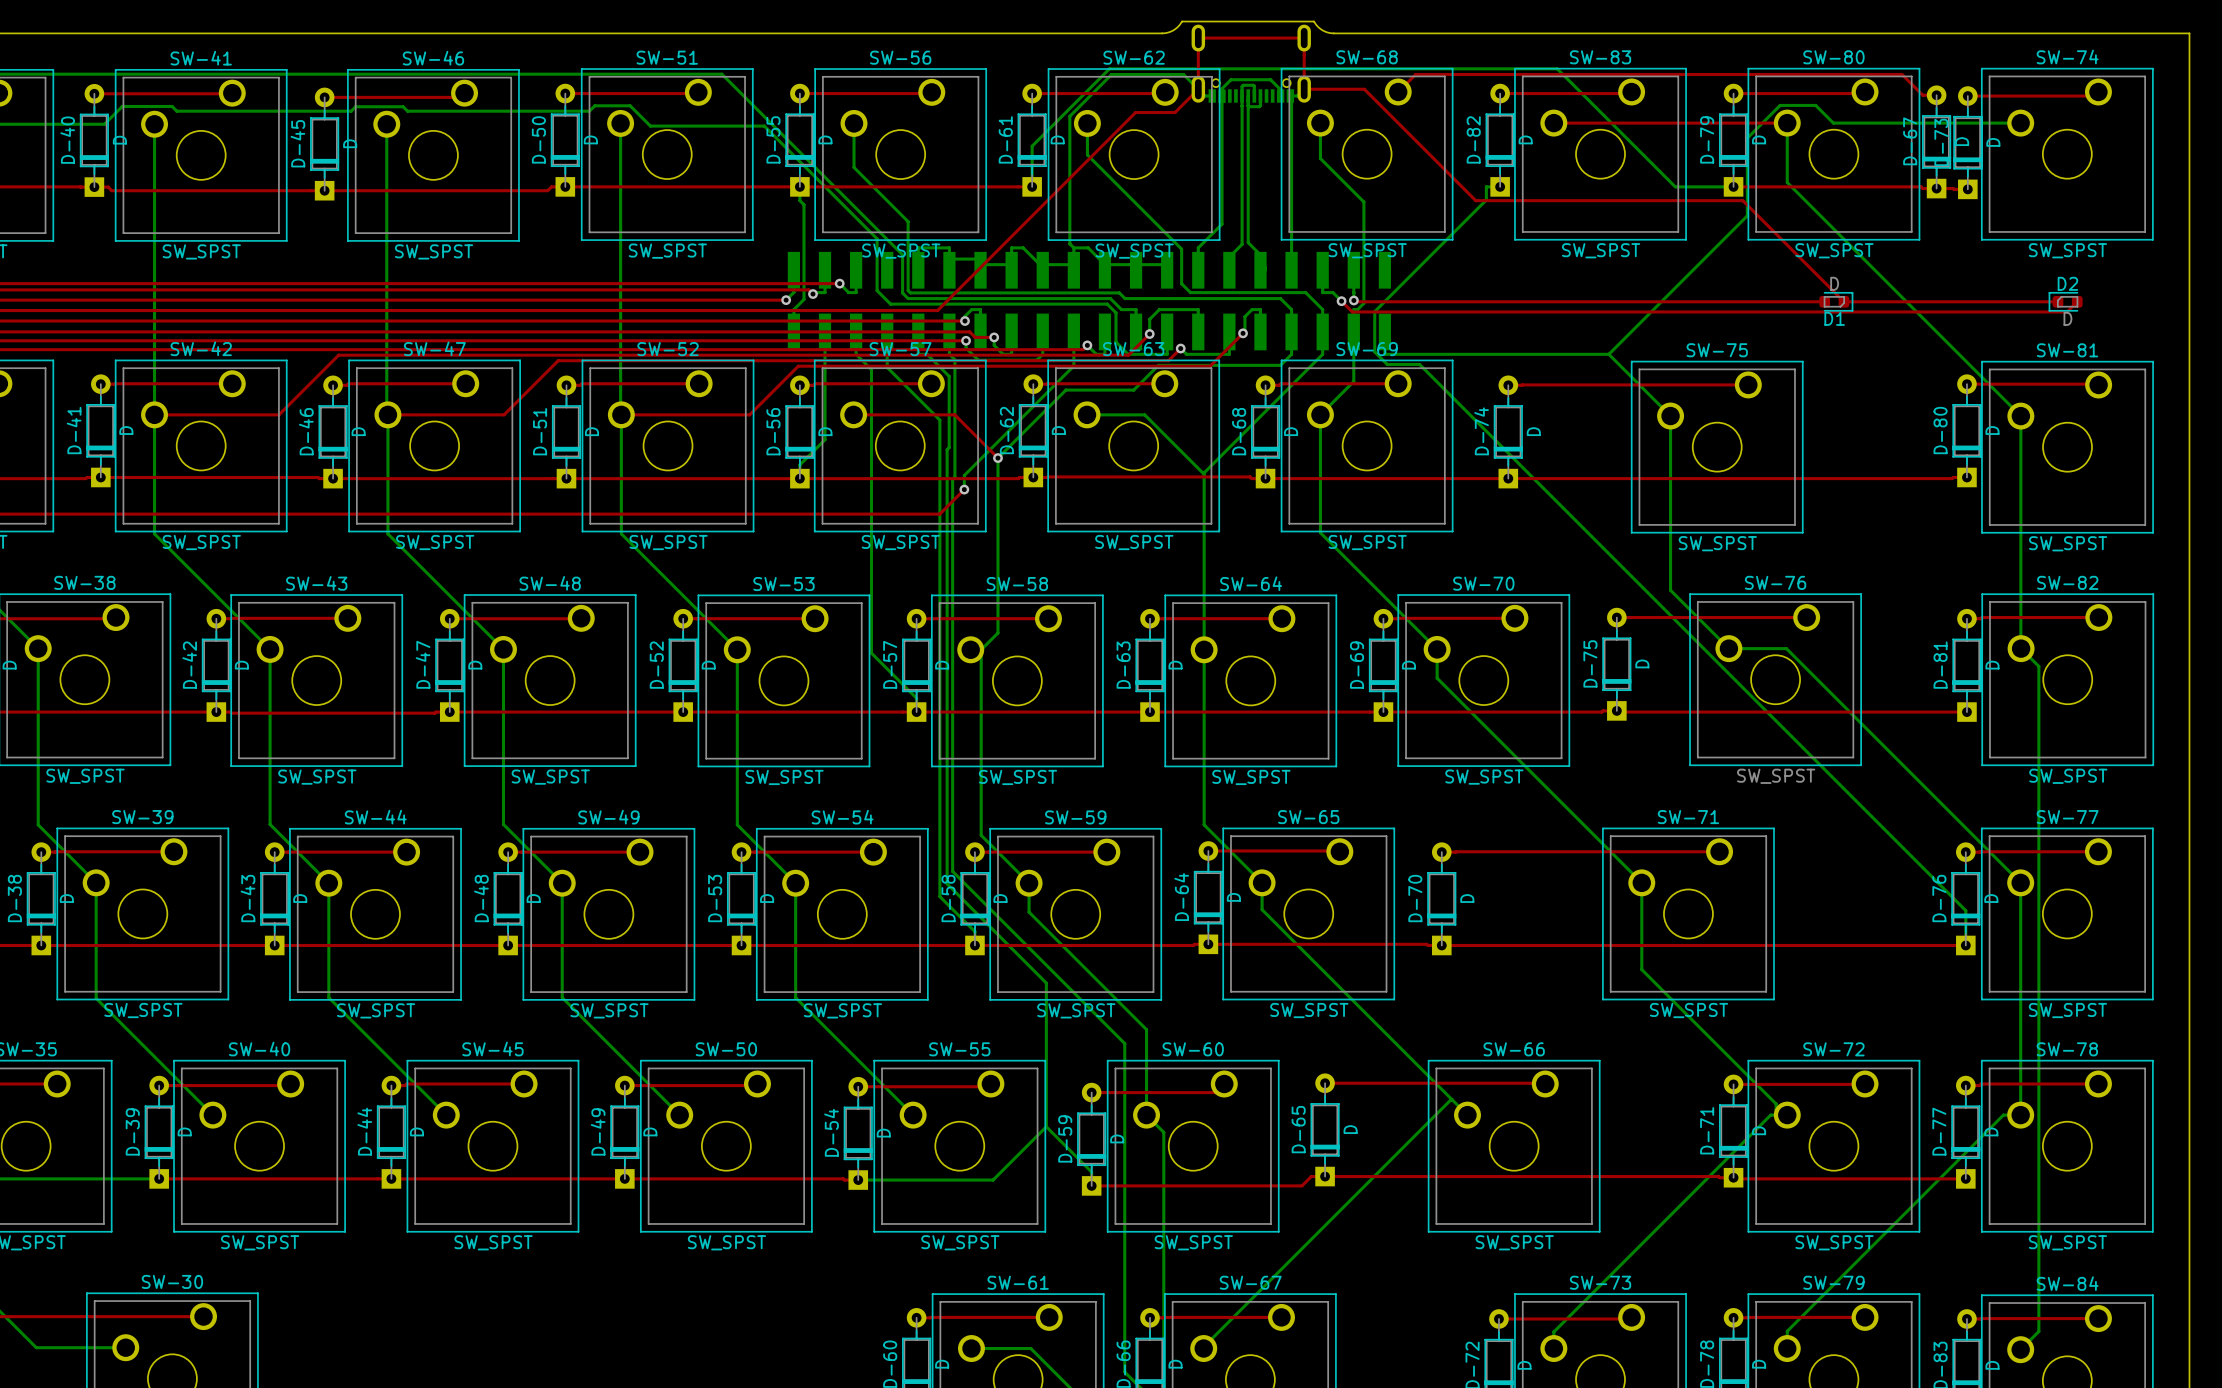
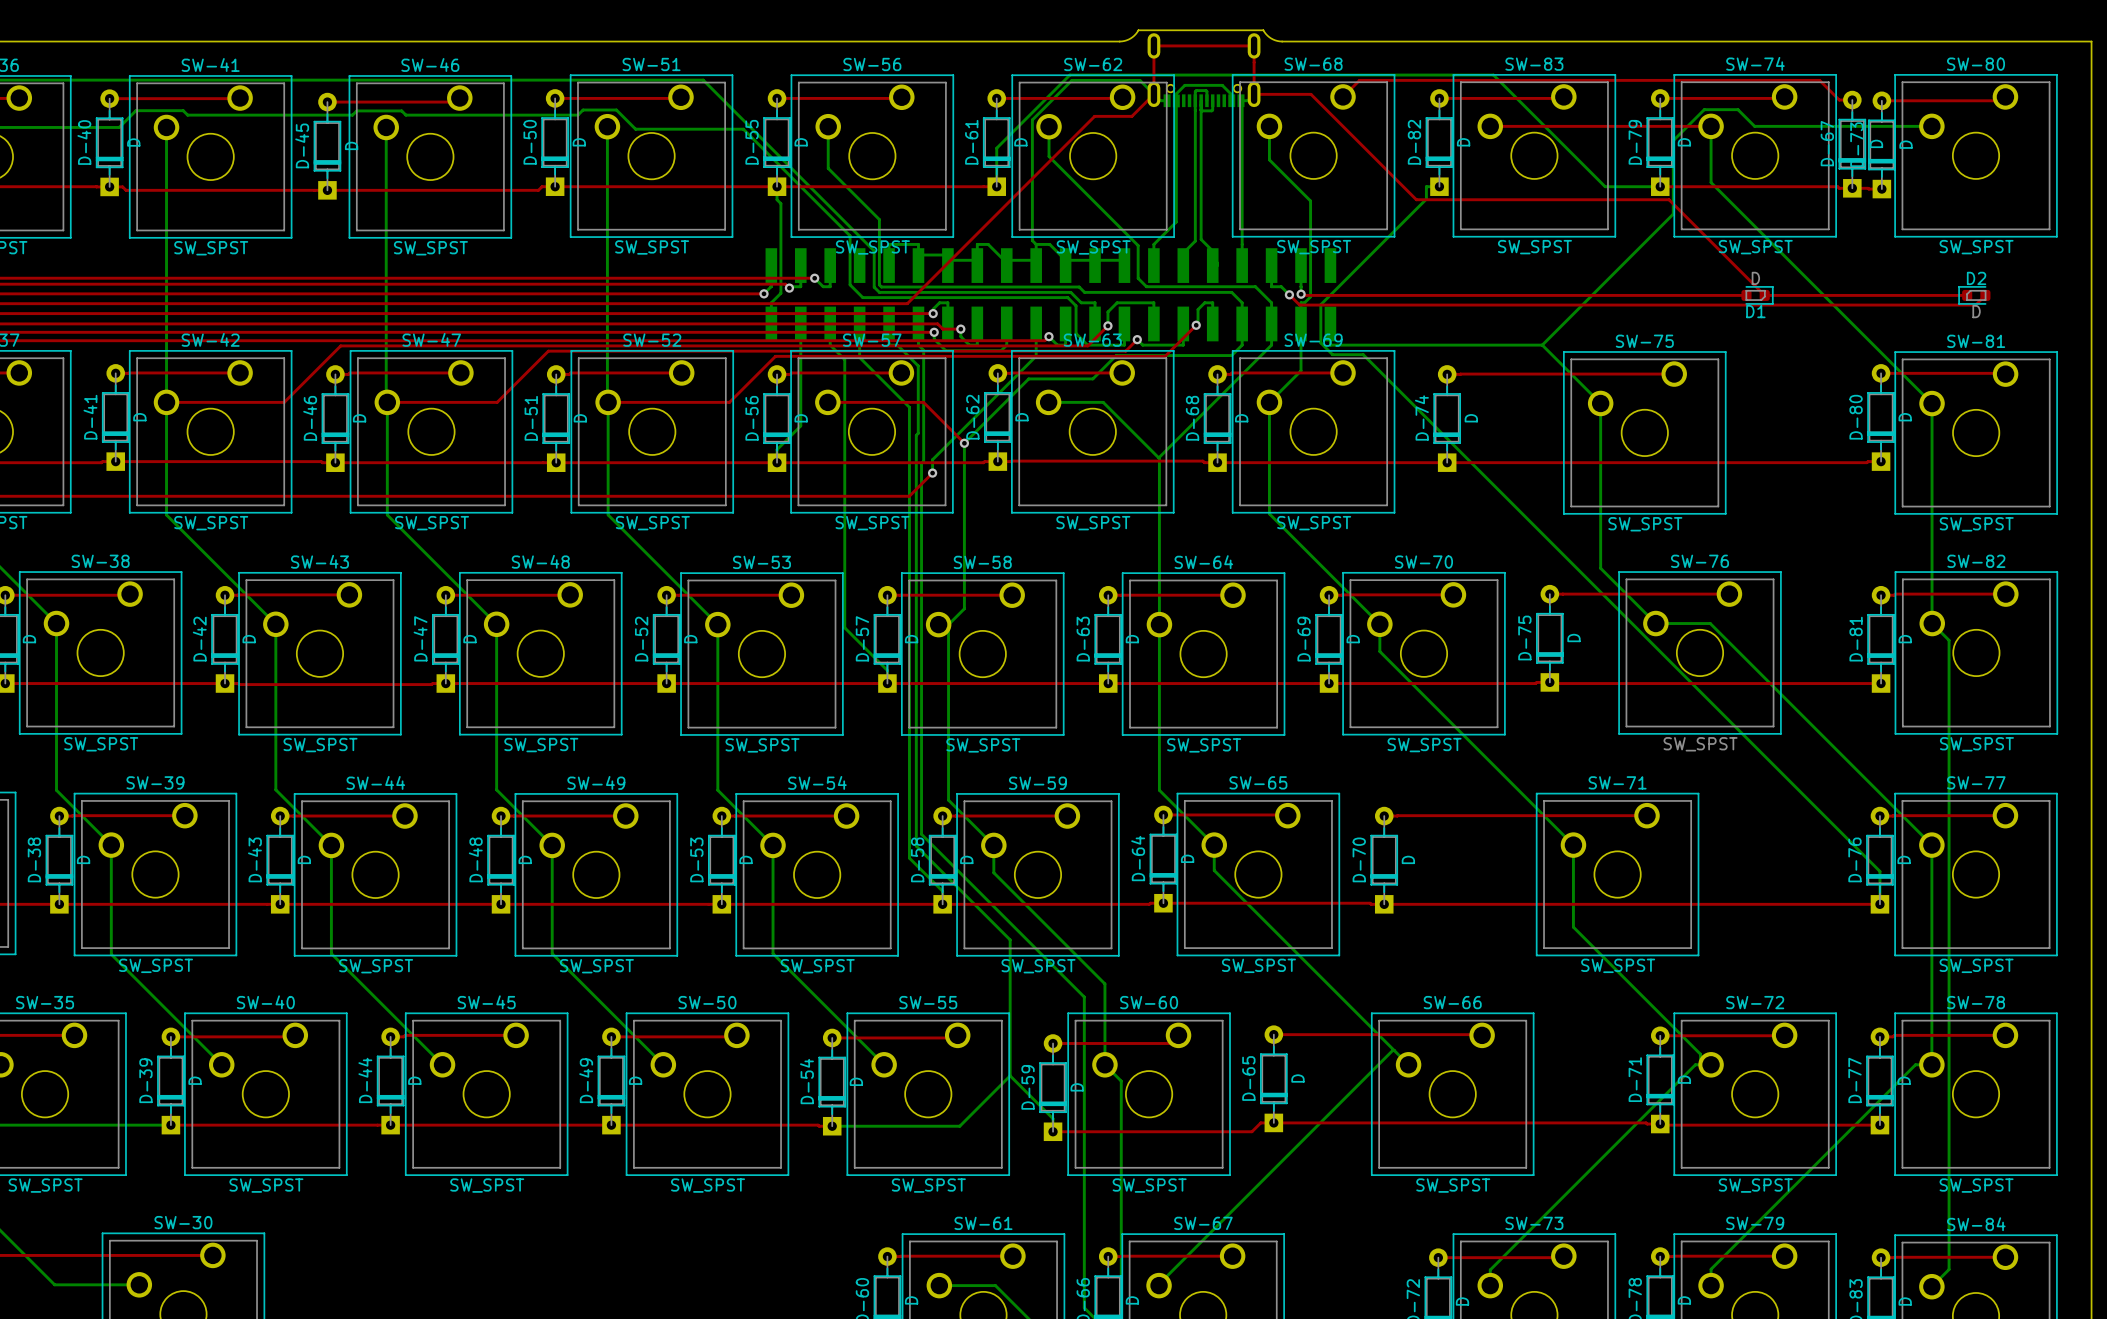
SW-80 name: SW-80 (1833, 57) -> SW-74 (1755, 63)
SW-74 name: SW-74 (2067, 57) -> SW-80 (1976, 64)

